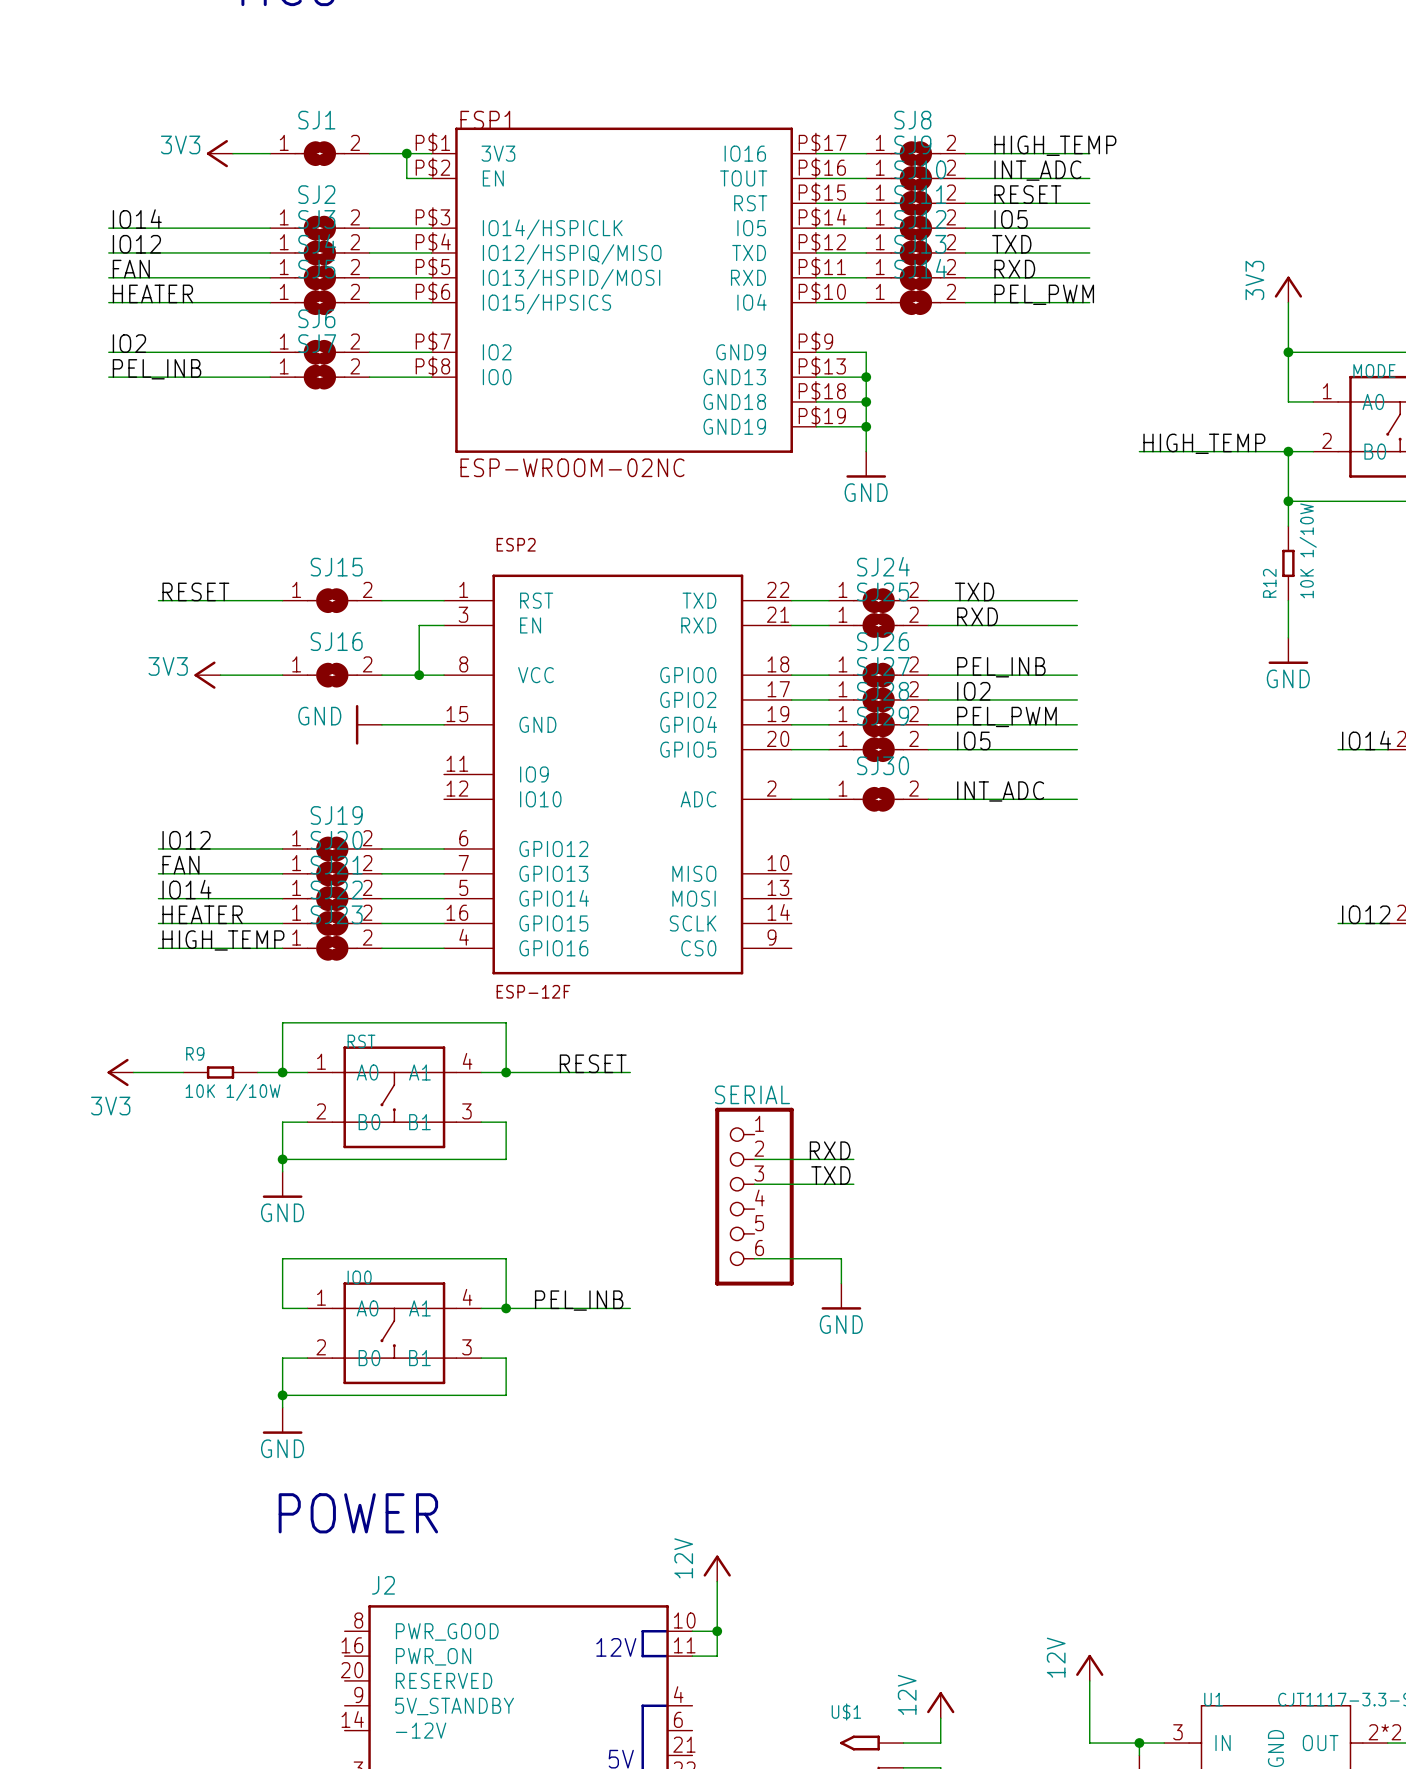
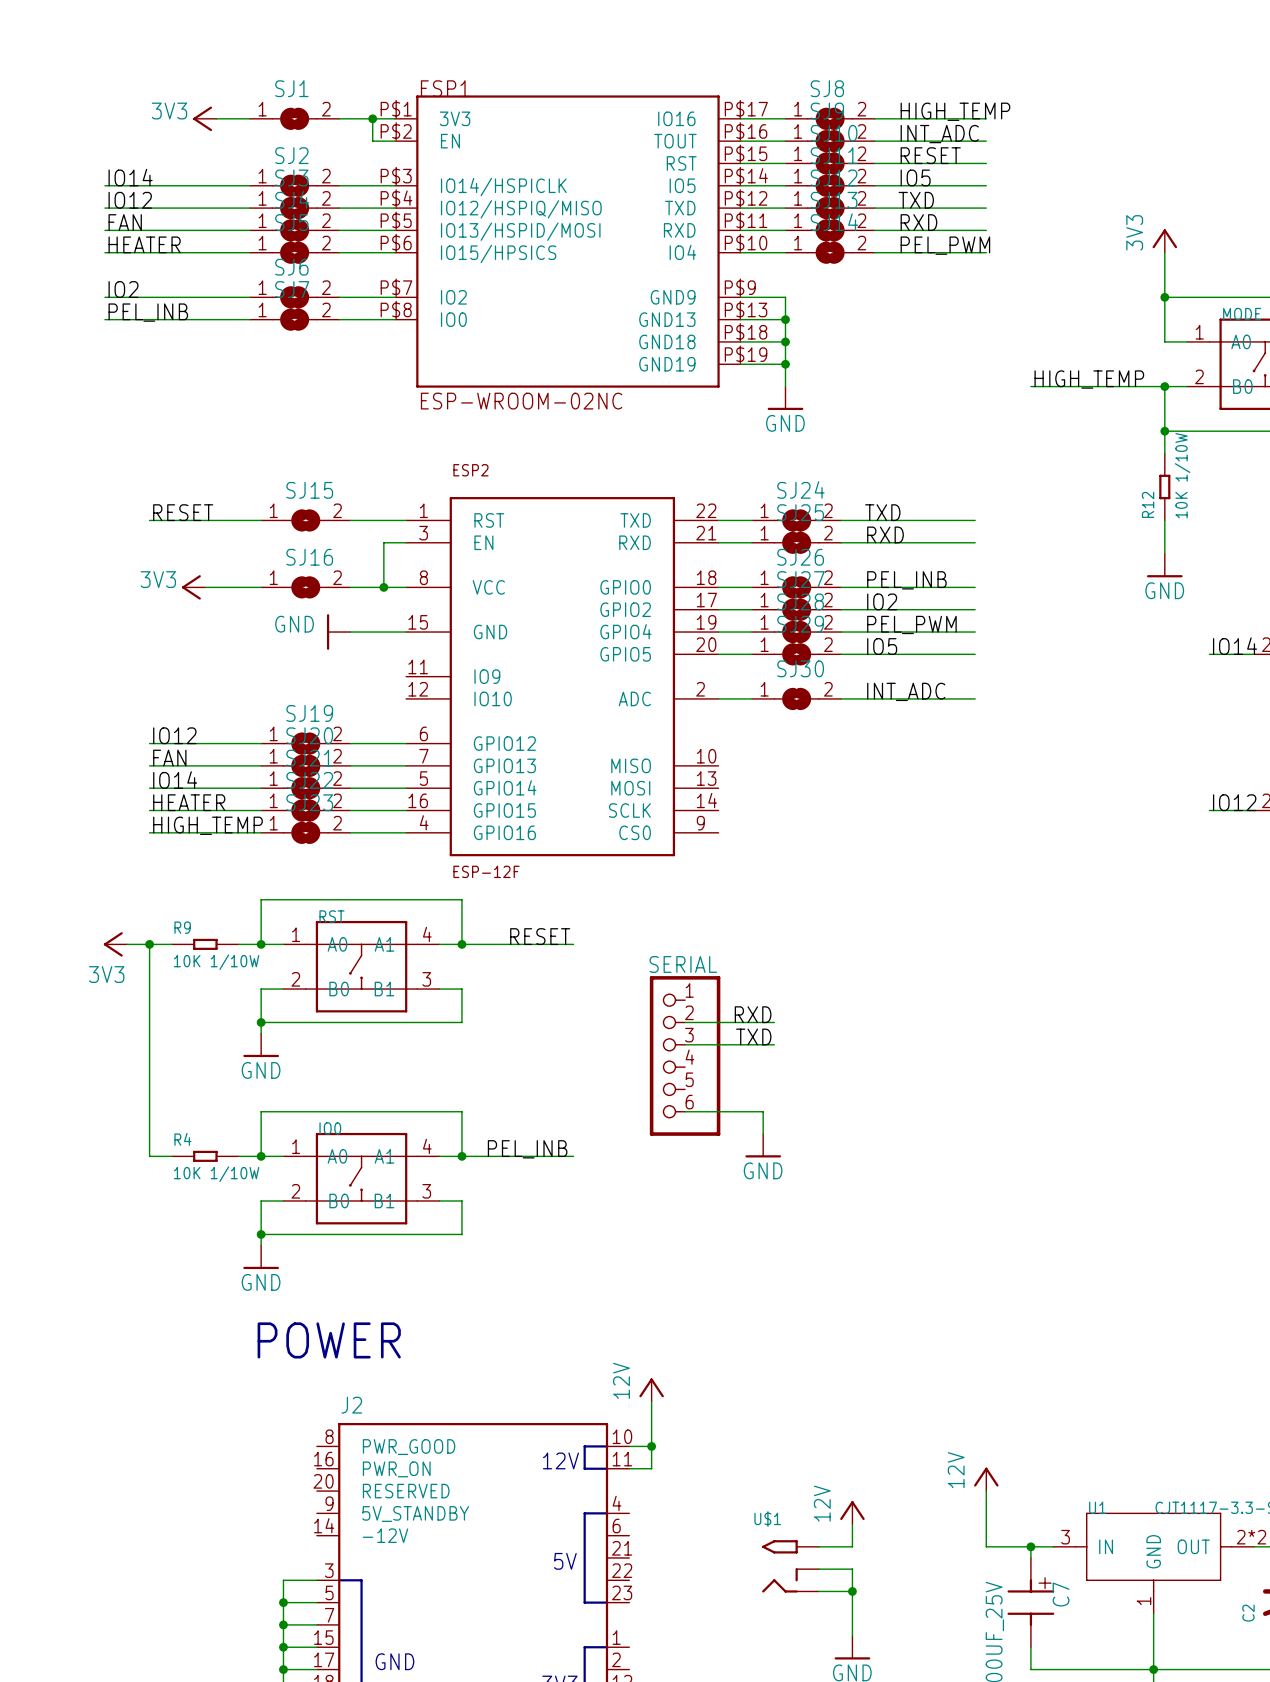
wire: none -> (149, 944) (149, 1156) (171, 1156)
junction: none -> (149, 944)
R4: none -> 10K 1/10W (205, 1156)
wire: none -> (238, 1156) (261, 1156)
junction: none -> (261, 1156)

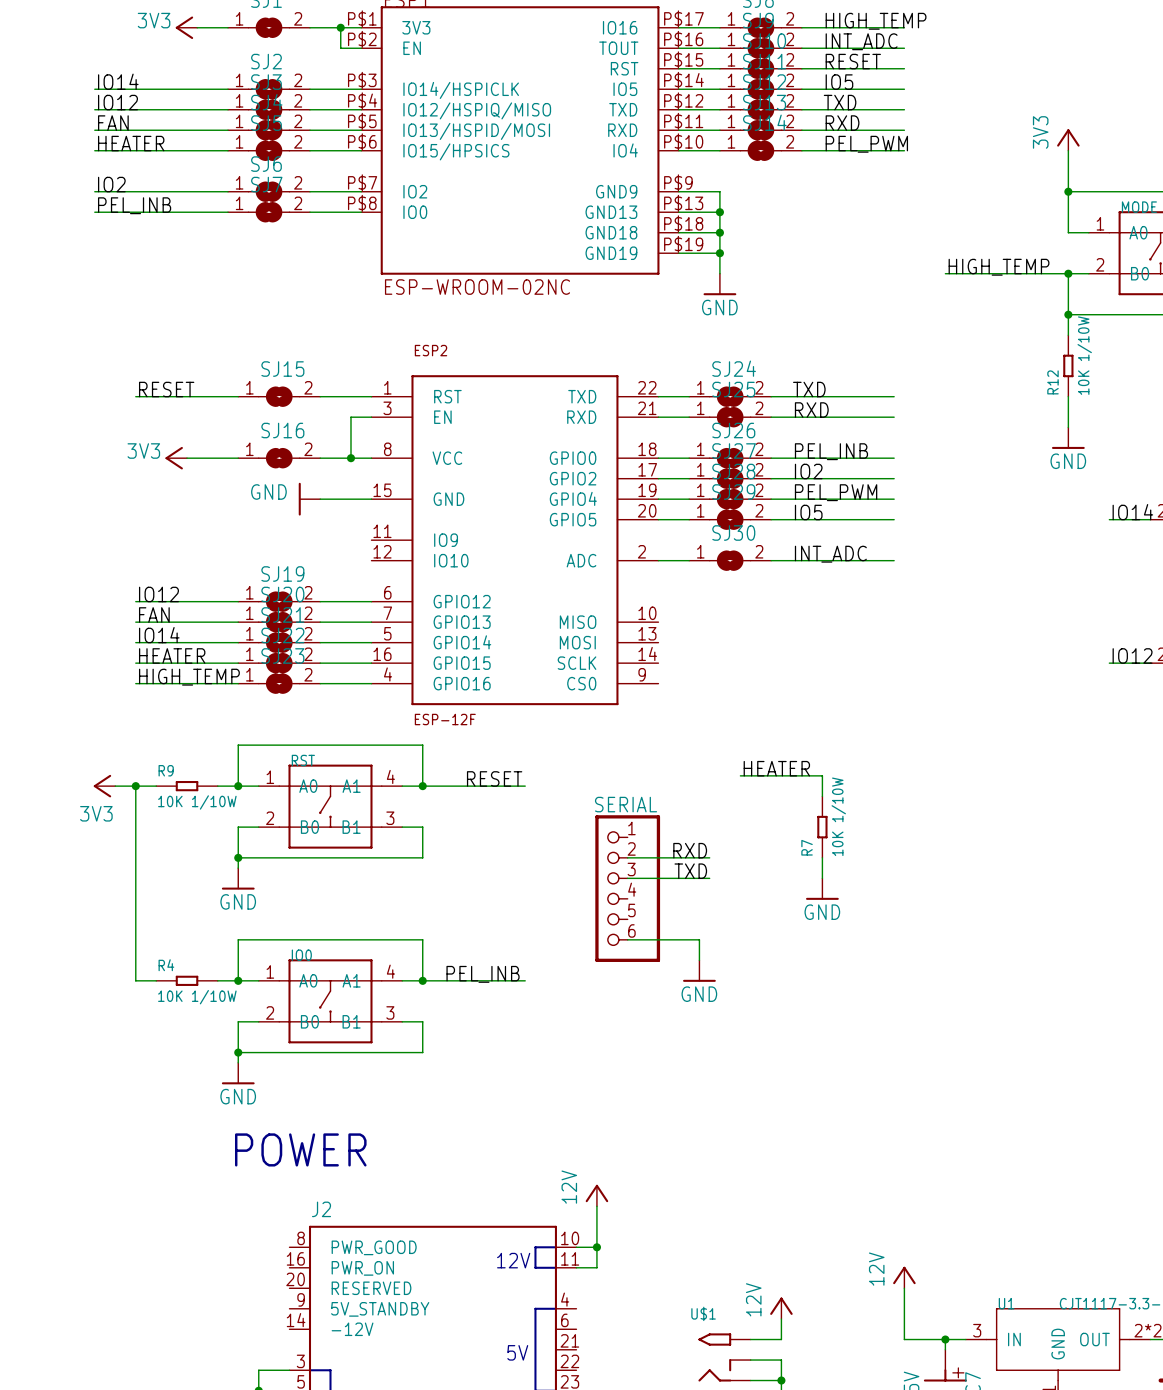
label: none -> HEATER (776, 768)
wire: none -> (740, 775) (822, 775) (822, 796)
R7: none -> 10K 1/10W (822, 827)
wire: none -> (822, 857) (822, 878)
power symbol: none -> GND (822, 889)

